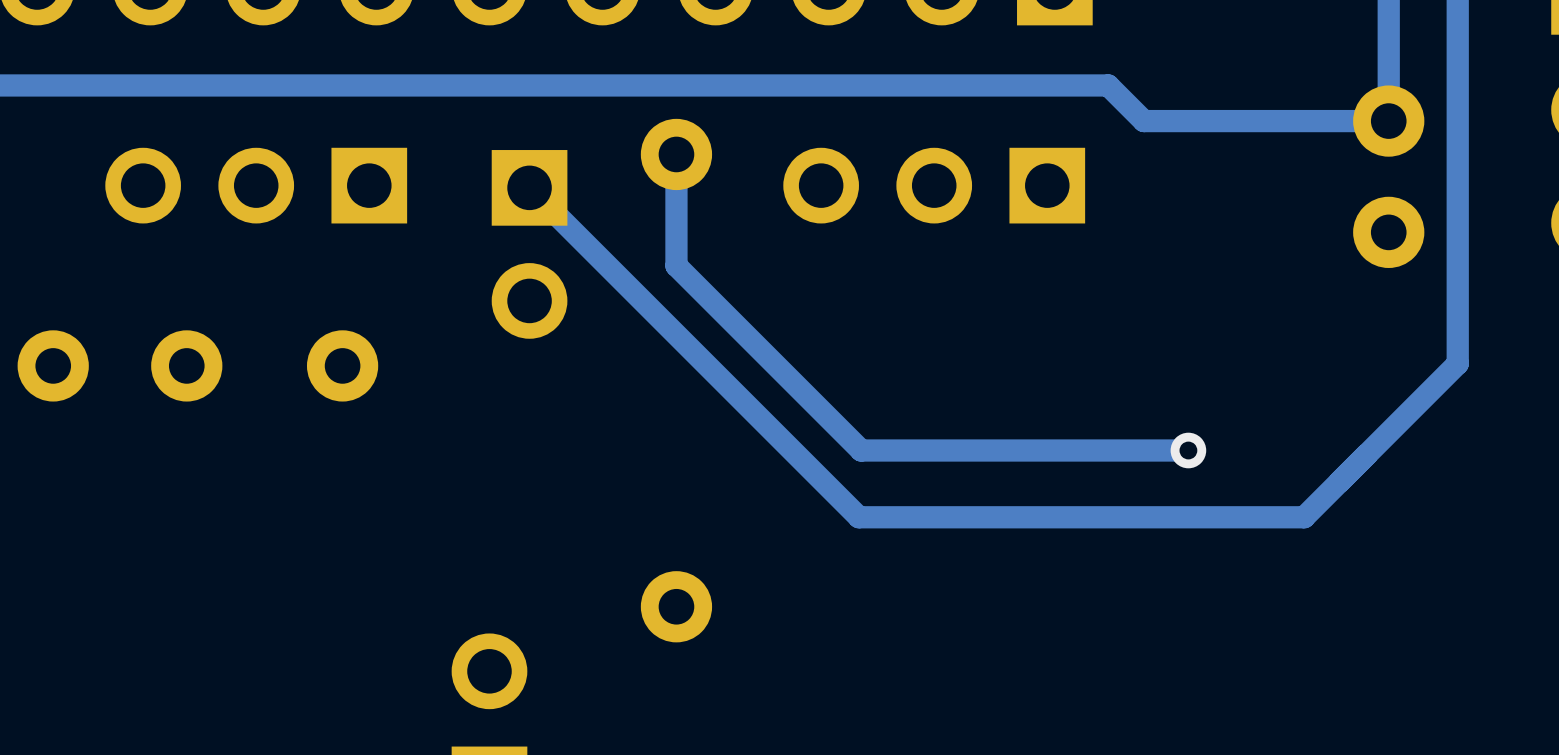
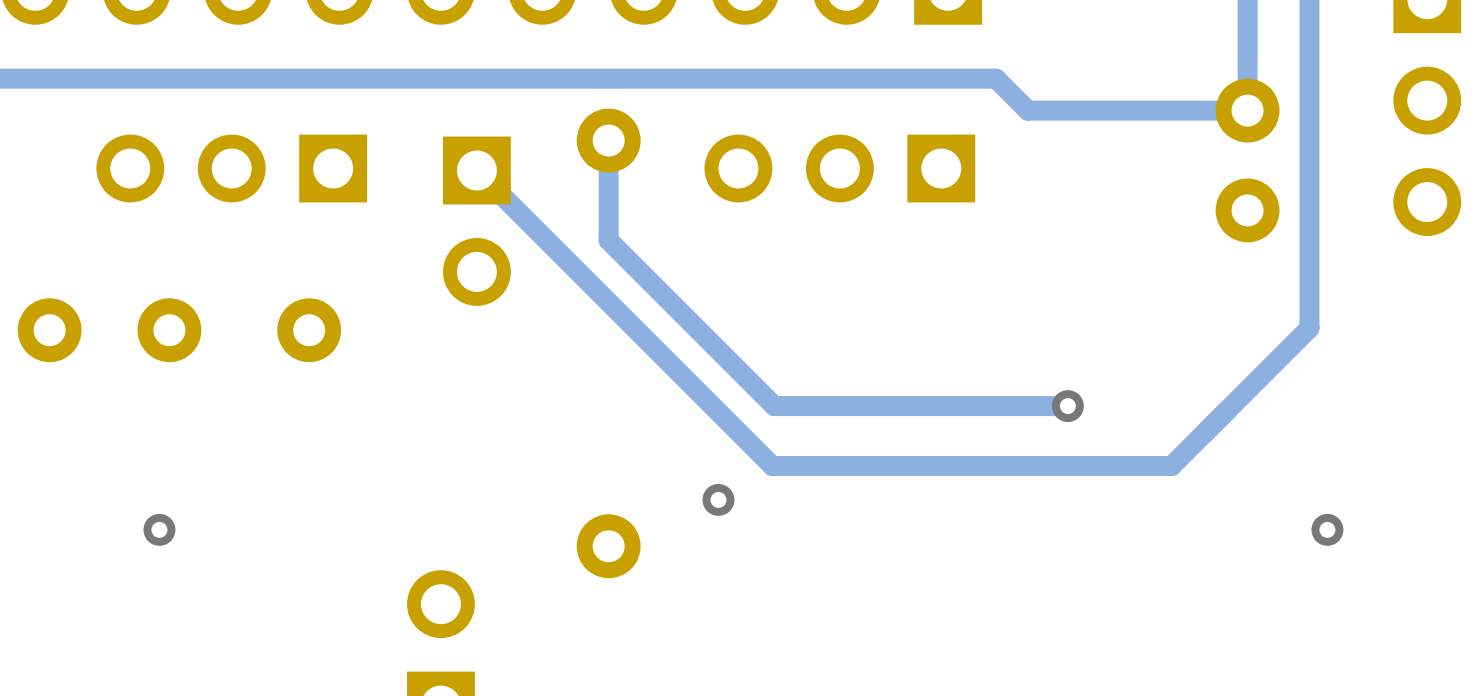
via: none -> (718, 499)
via: none -> (159, 529)
via: none -> (1327, 529)

